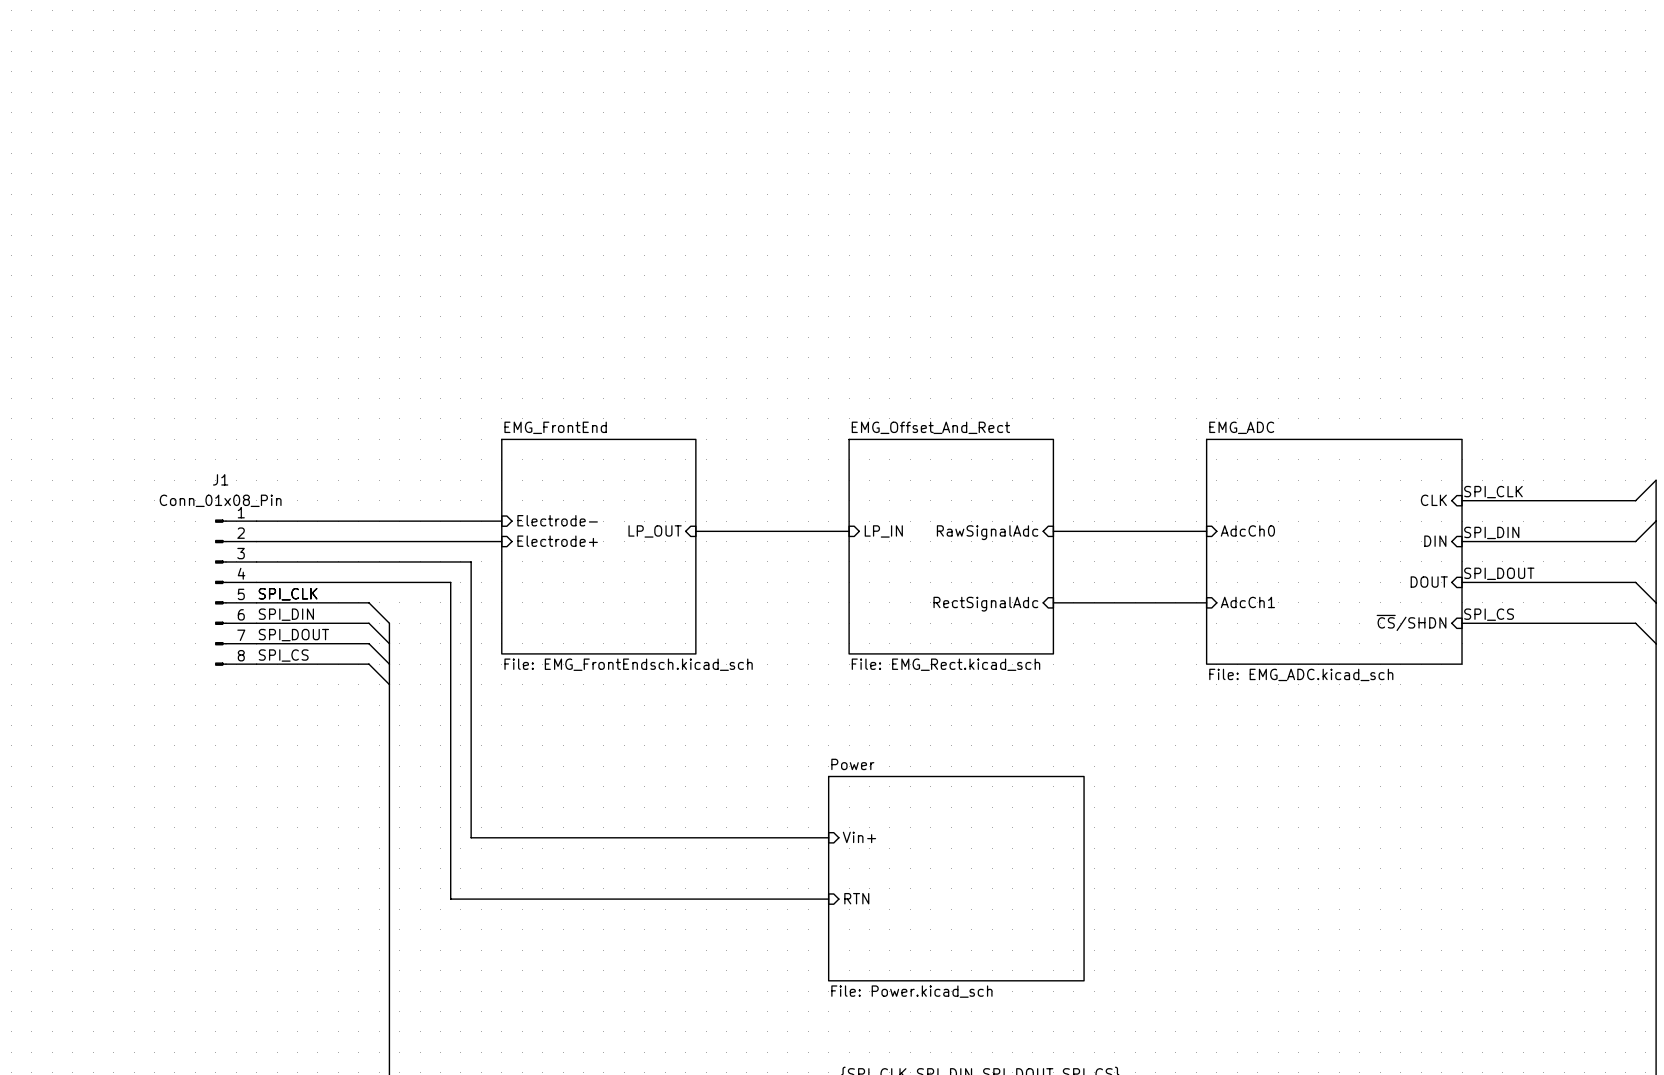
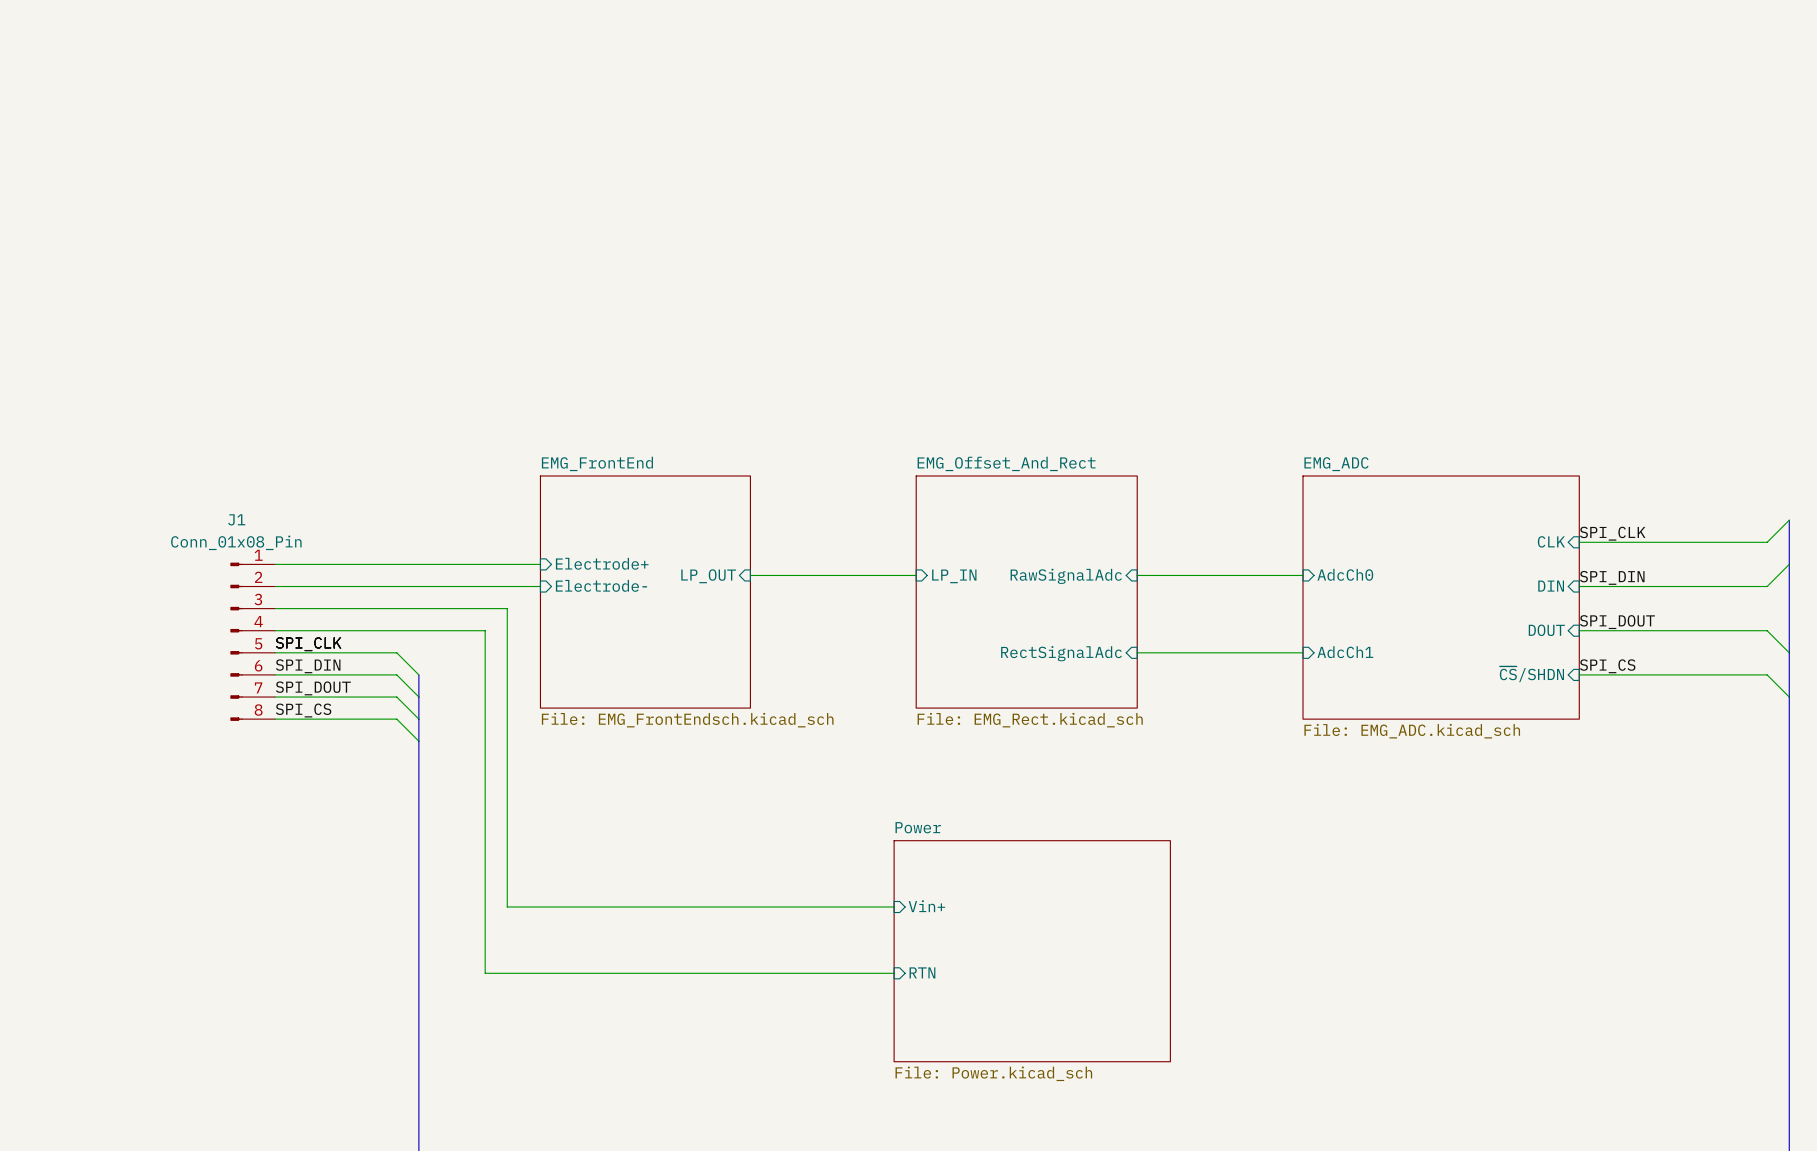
sheet pin: Electrode- (557, 520) -> Electrode+ (602, 563)
sheet pin: Electrode+ (557, 541) -> Electrode- (601, 585)

